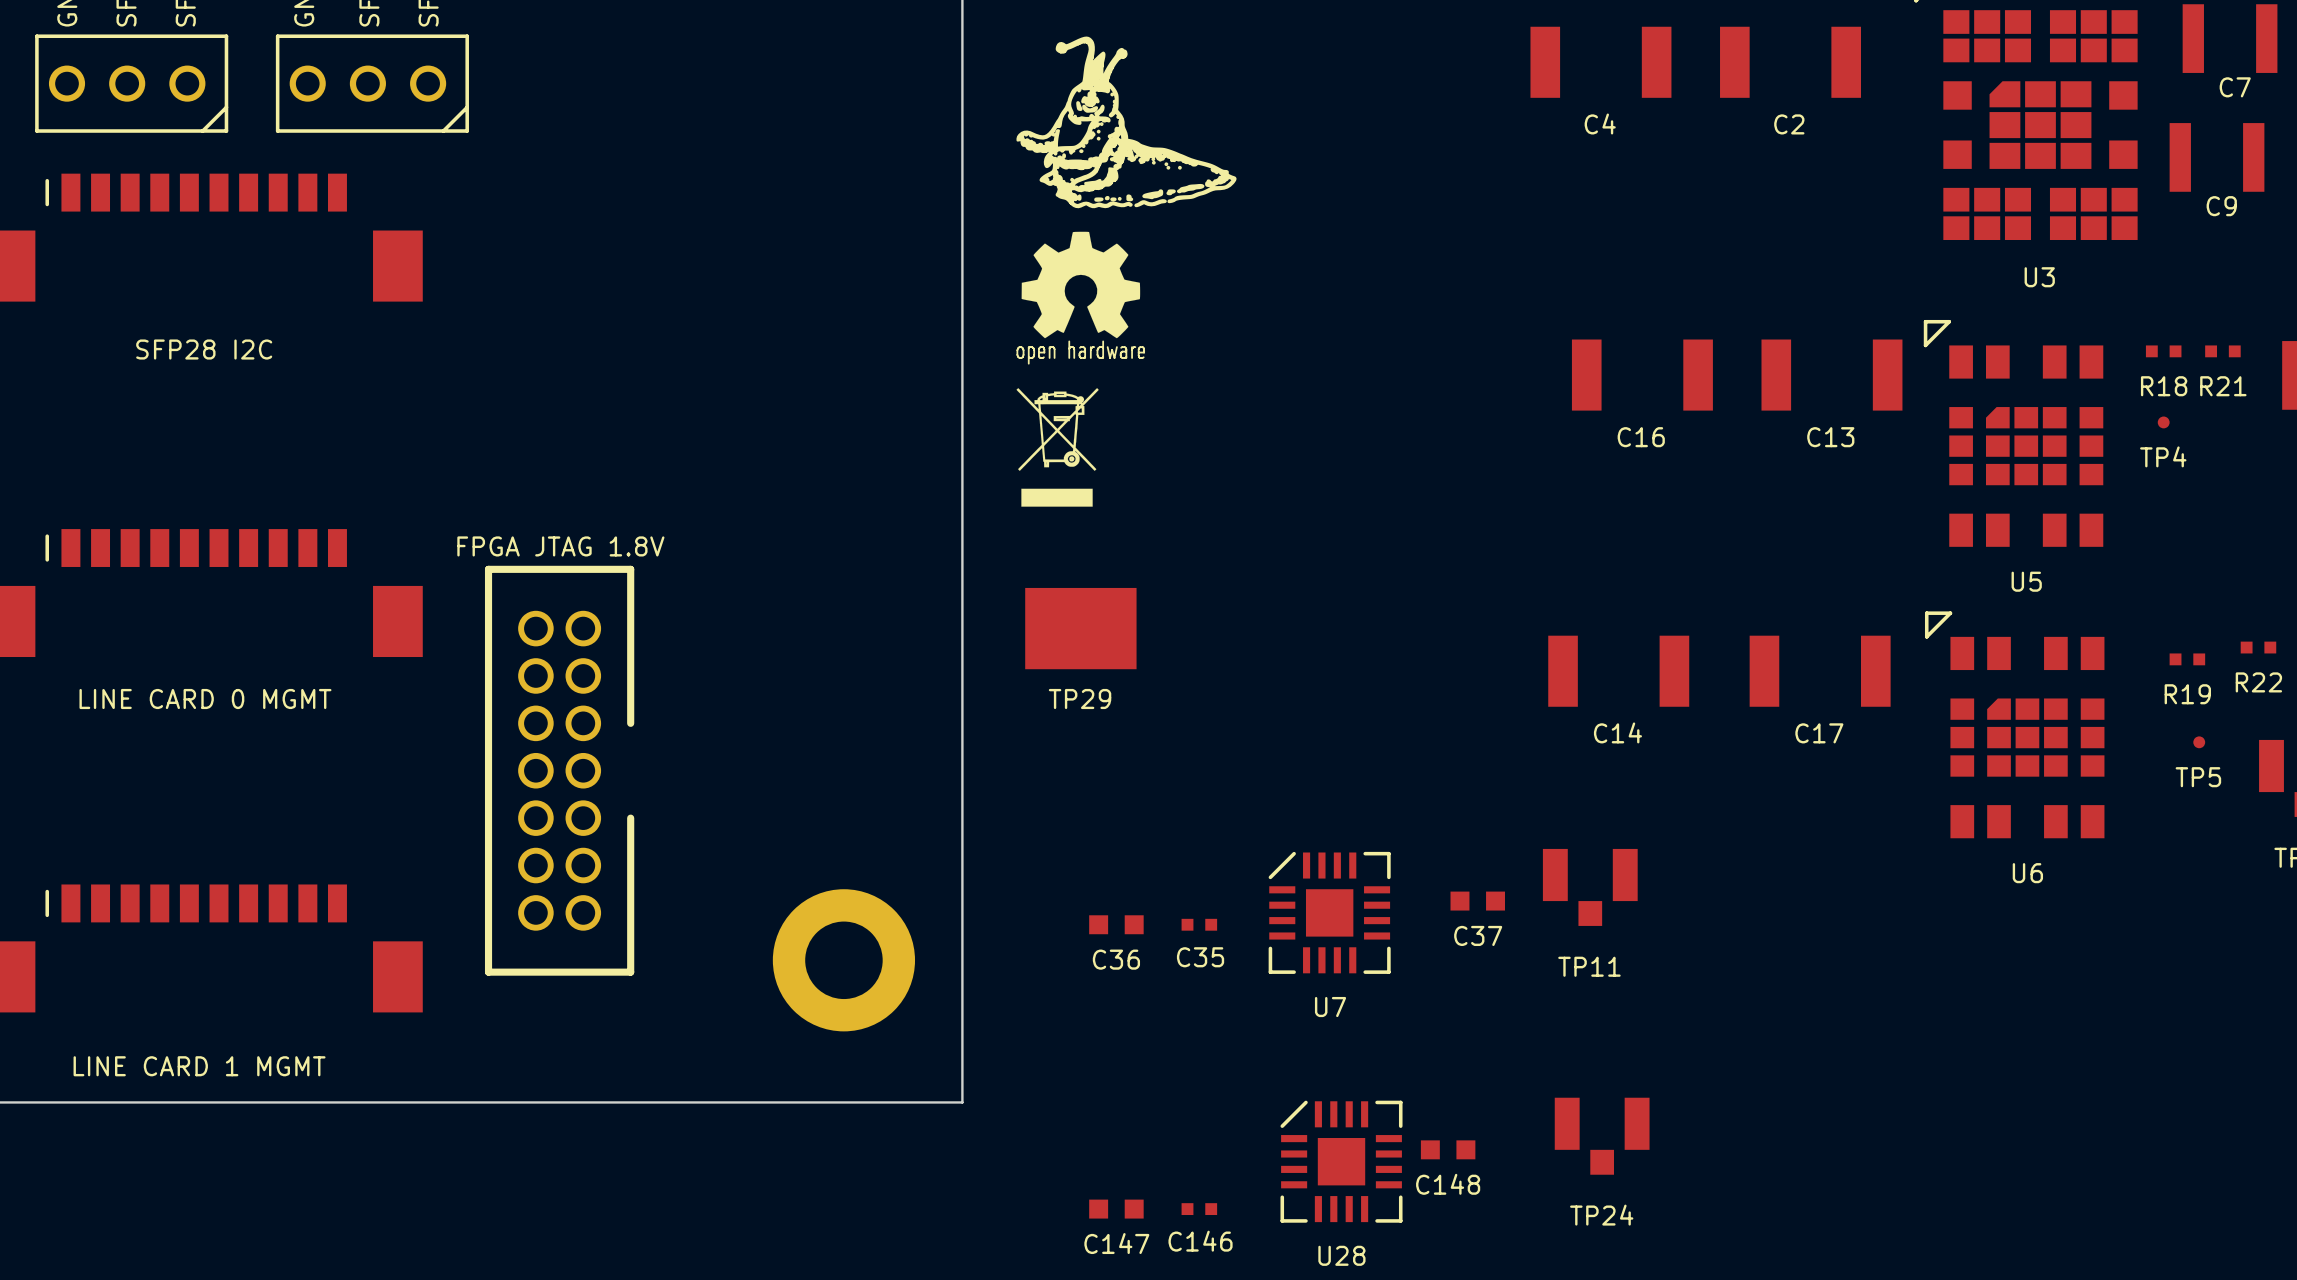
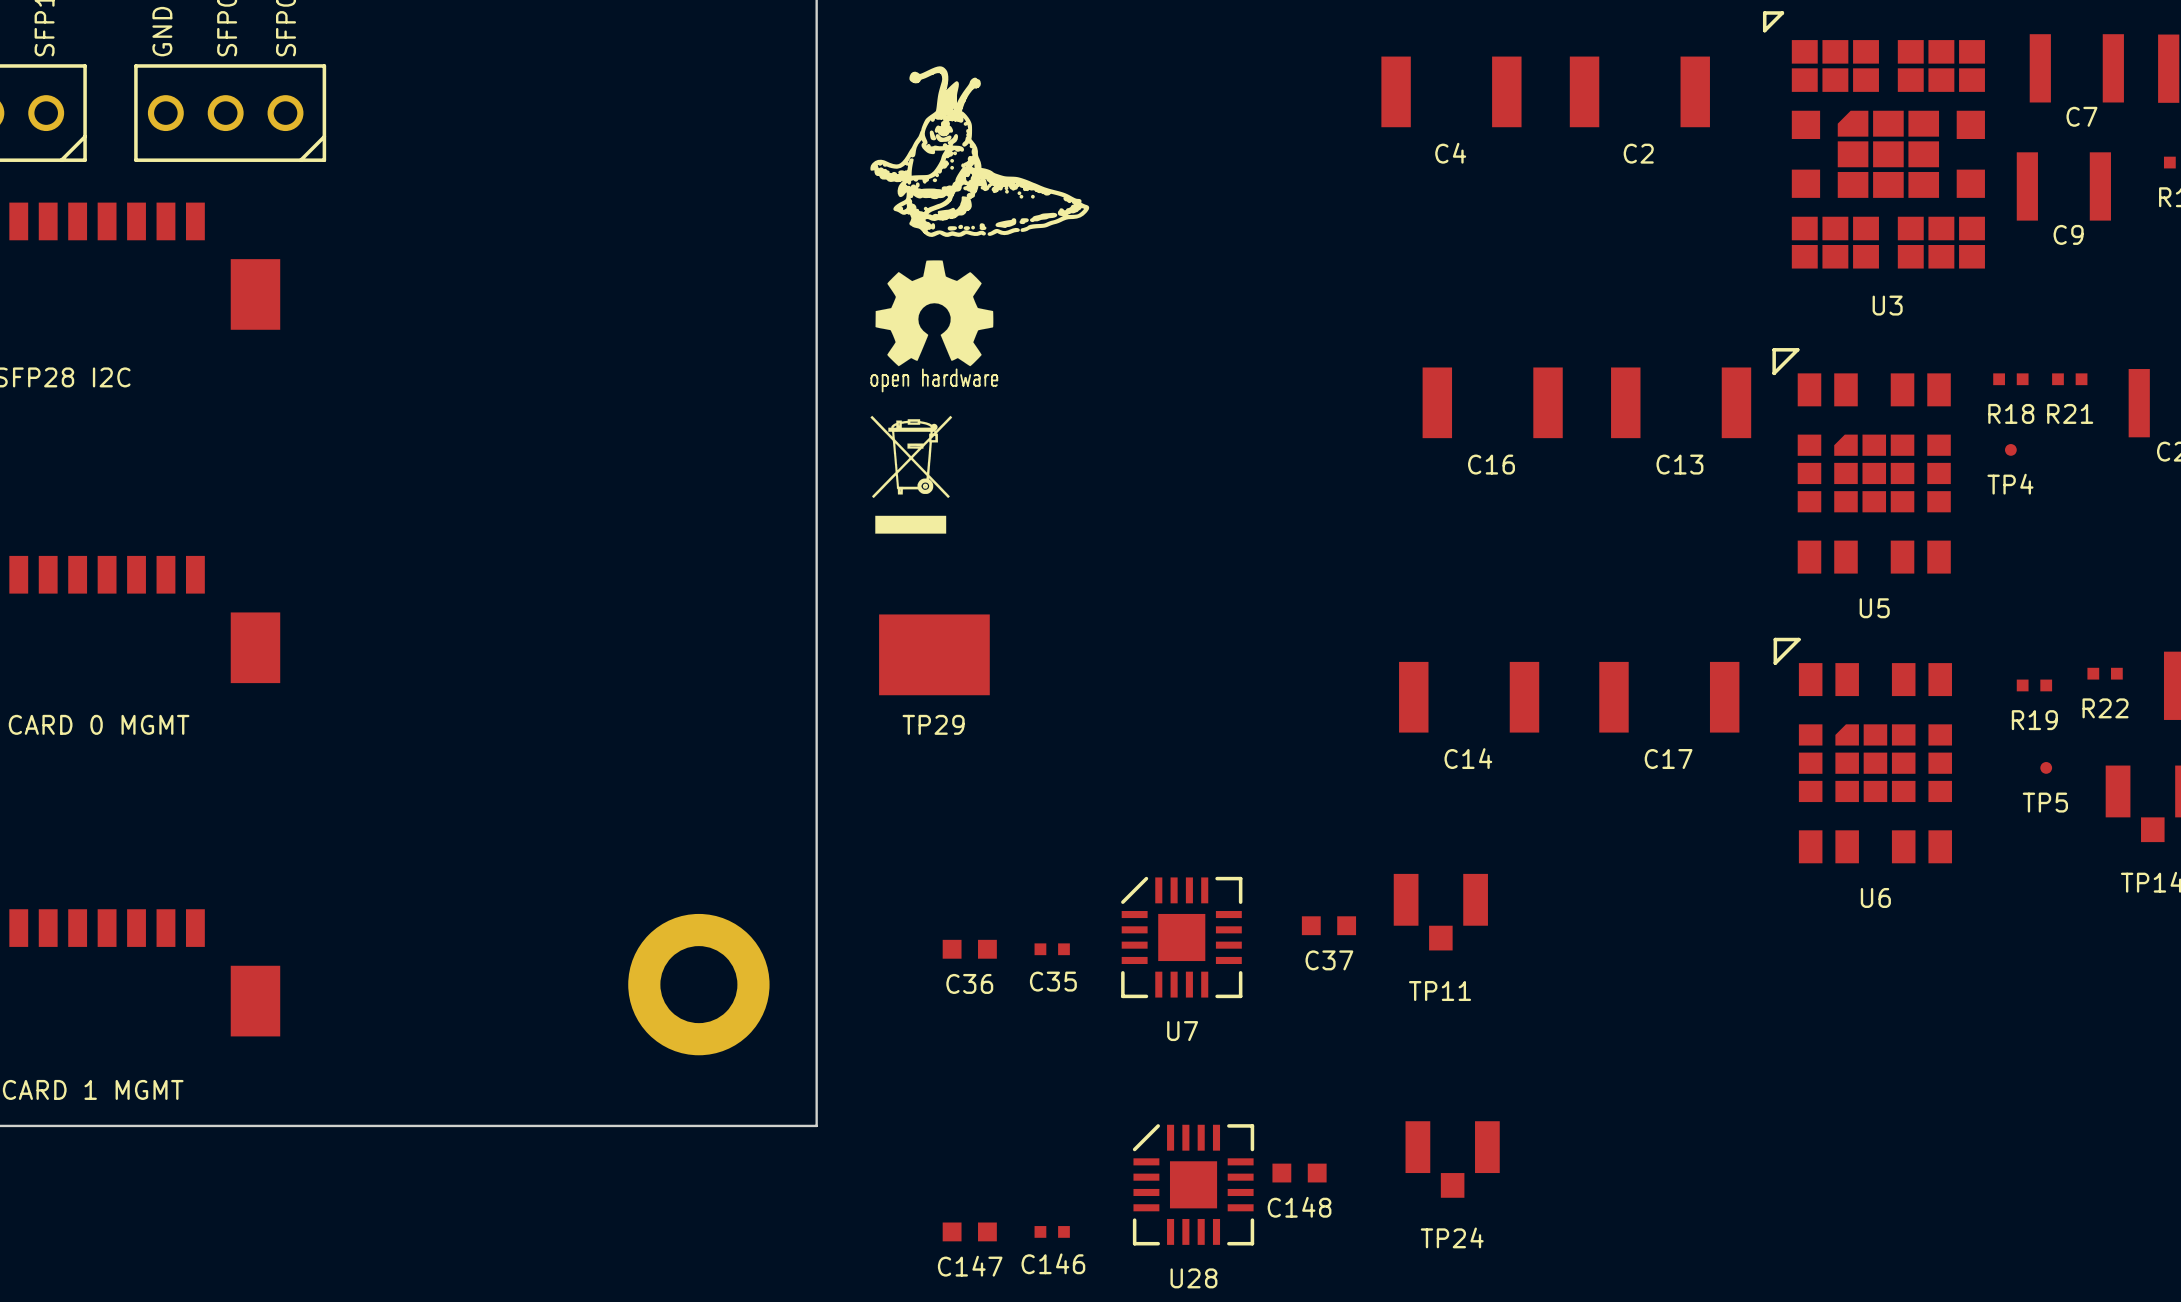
text: FPGA JTAG 1.8V (560, 546) -> none
part: (559, 770) -> none

